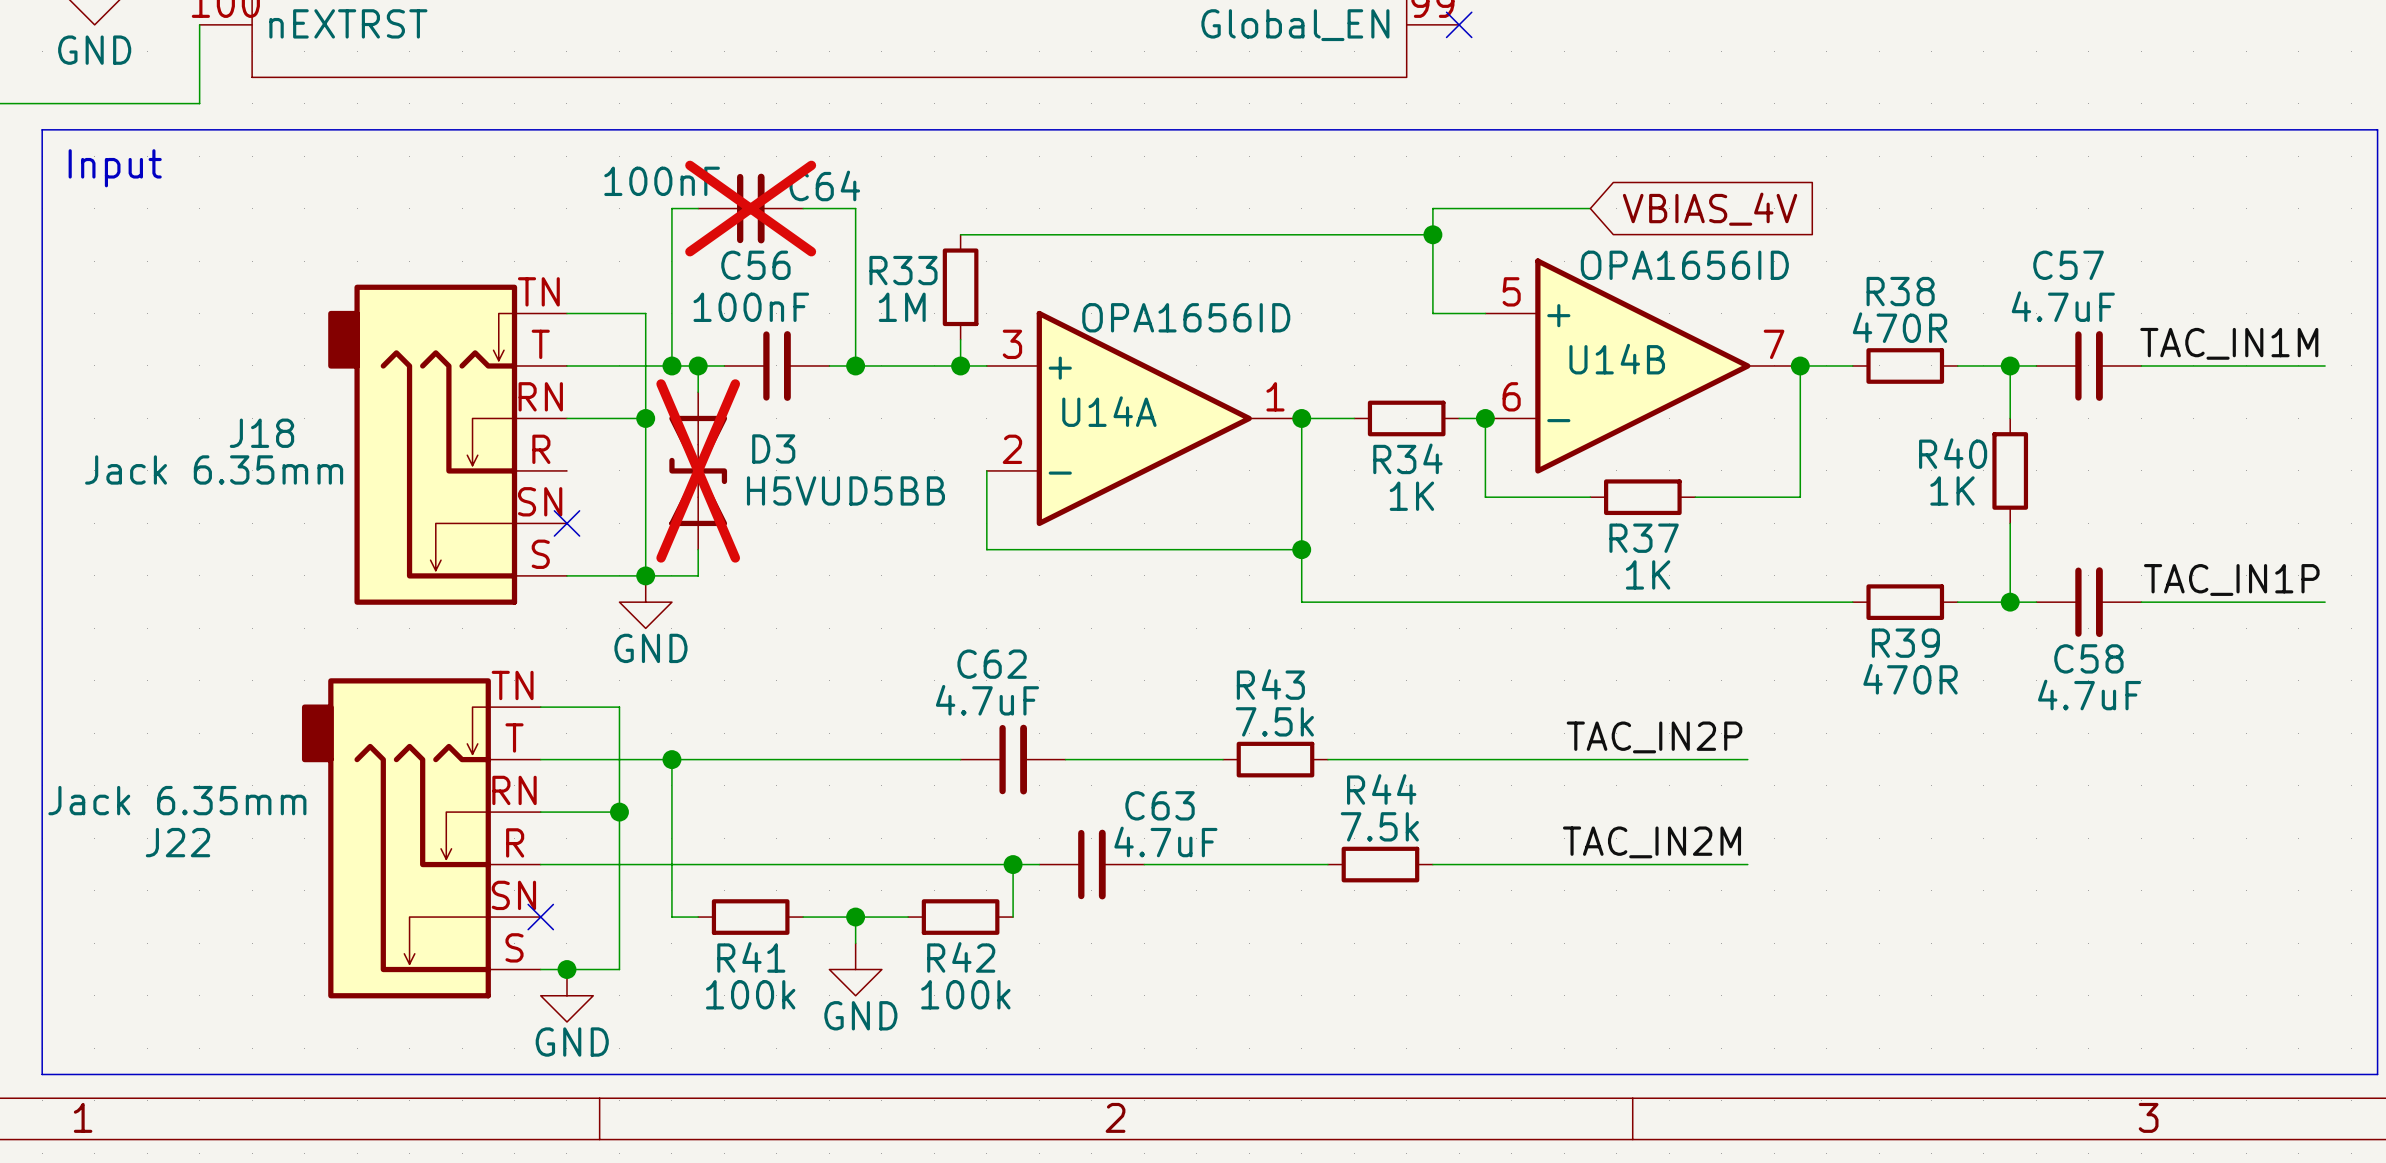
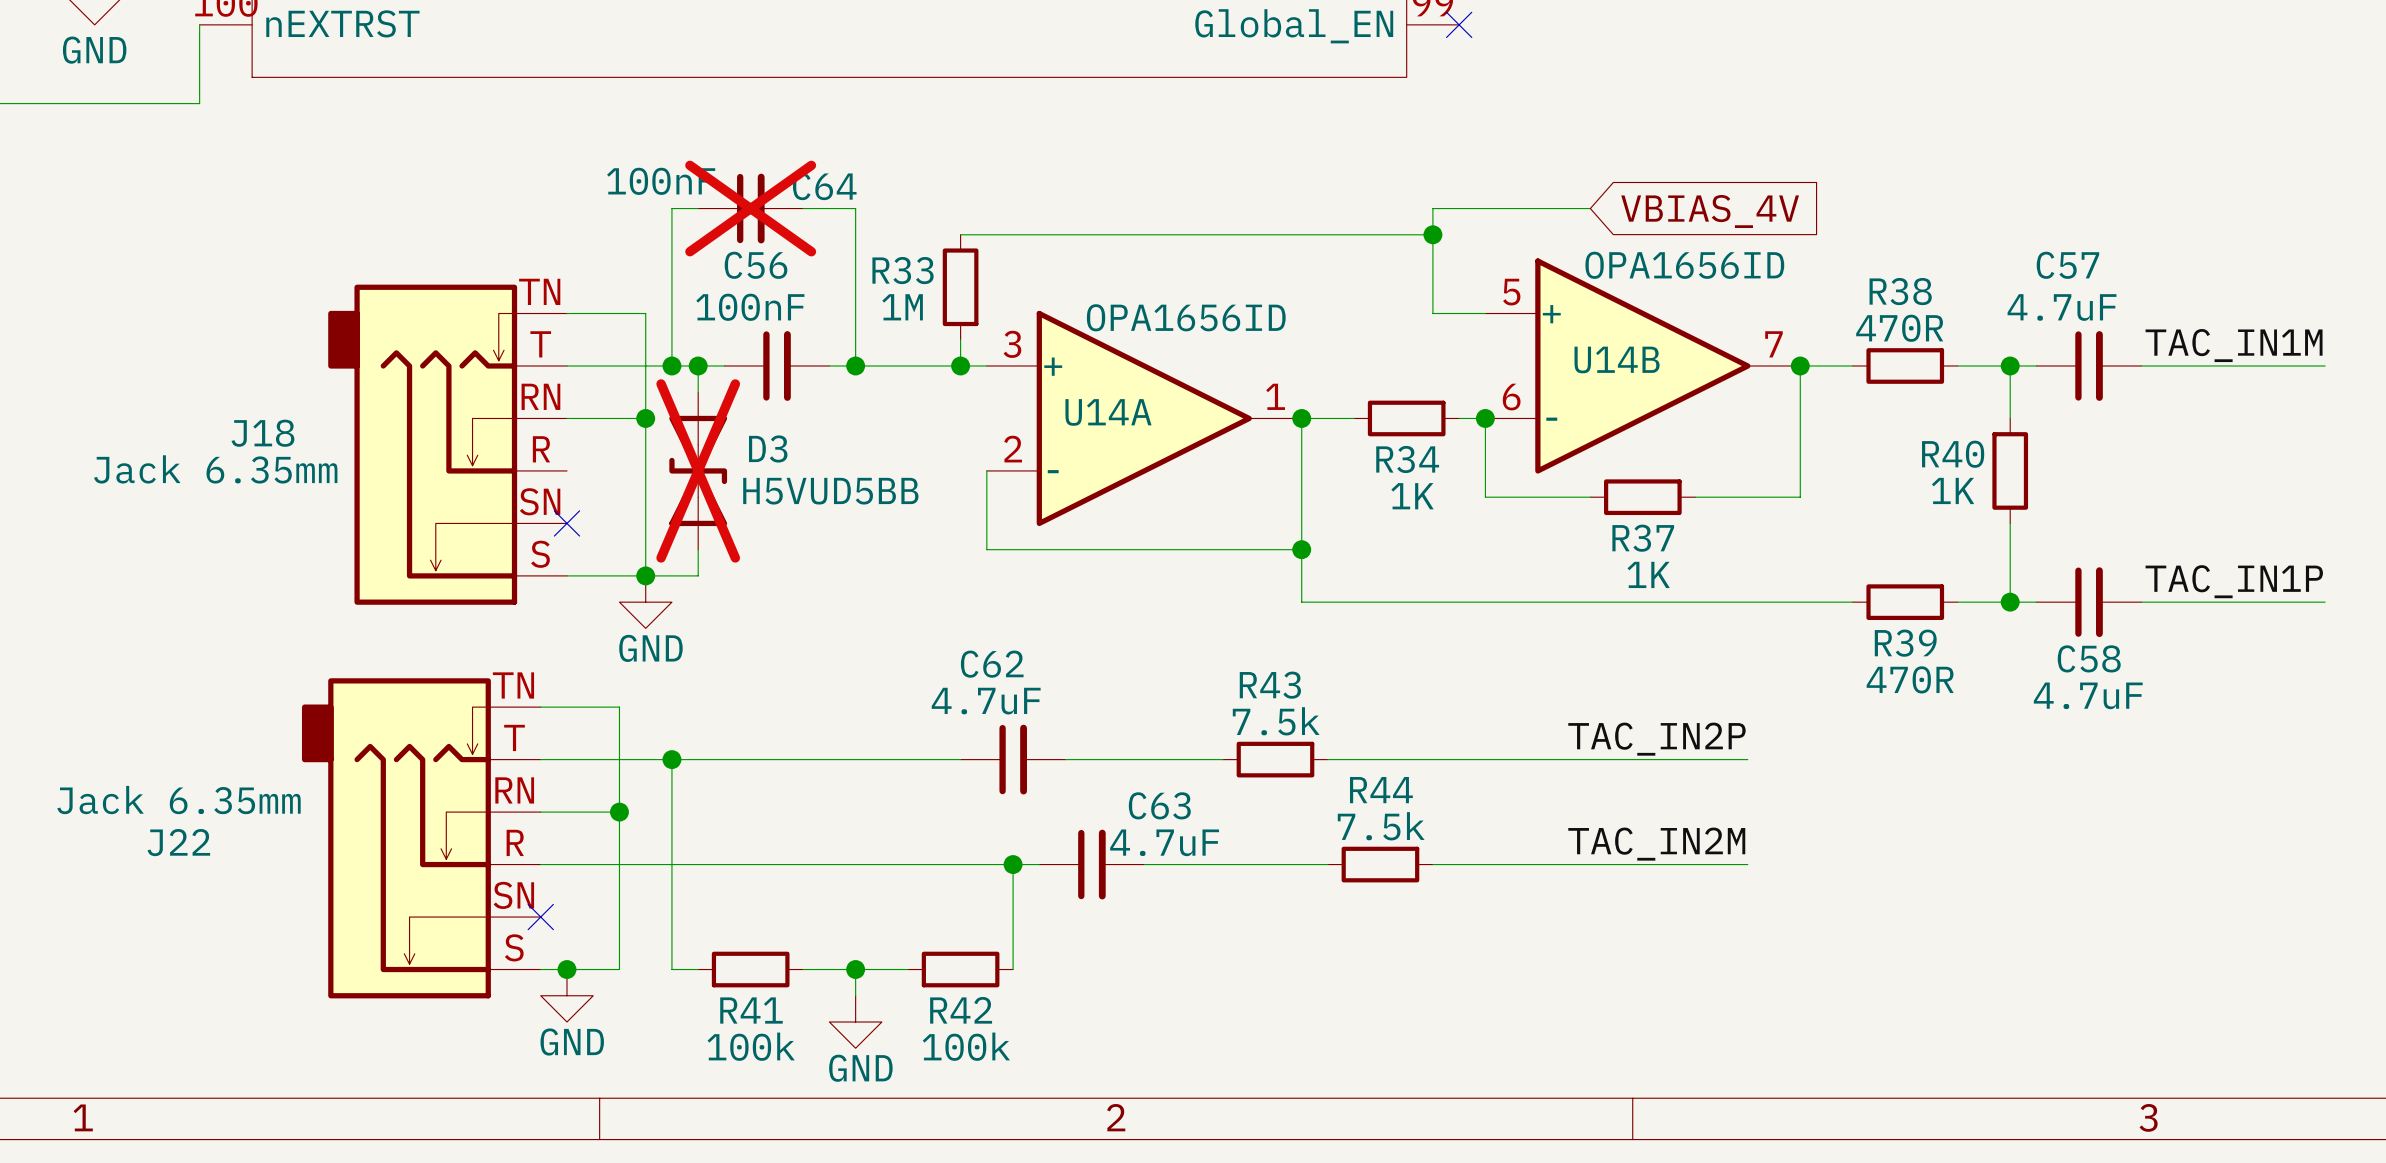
line: (42, 129) (2377, 129) (2377, 1074) (42, 1074) (42, 129) -> none
text: Input (115, 168) -> none
wire: (671, 917) (698, 917) -> (671, 917) (671, 969) (698, 969)
R41 position: (750, 917) -> (750, 969)
wire: (803, 917) (908, 917) -> (803, 969) (908, 969)
wire: (855, 917) (855, 943) -> (855, 969) (855, 995)
junction position: (855, 917) -> (855, 969)
R42 position: (960, 917) -> (960, 969)
wire: none -> (1013, 917) (1013, 969)
power symbol position: GND (855, 969) -> GND (855, 1022)

